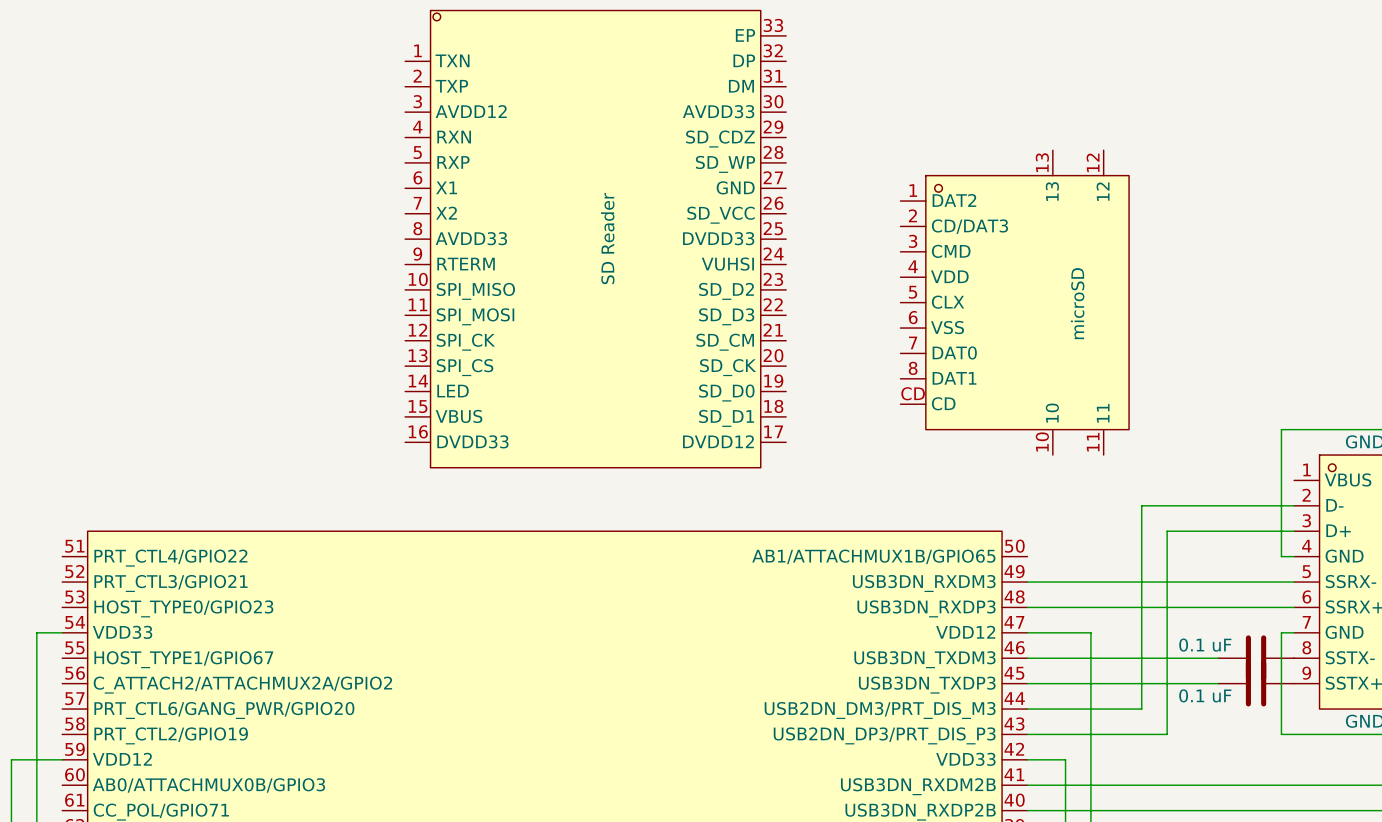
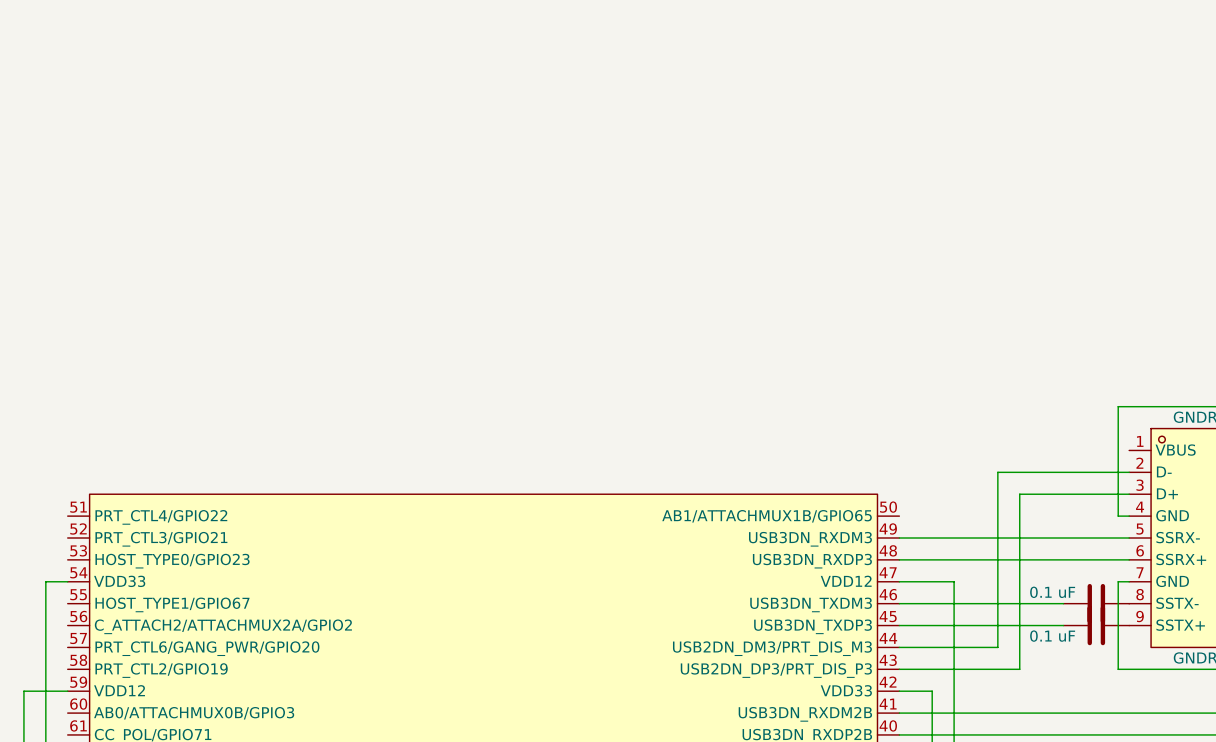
part: SD Reader (595, 239) -> none
microSD: (1014, 302) -> none

